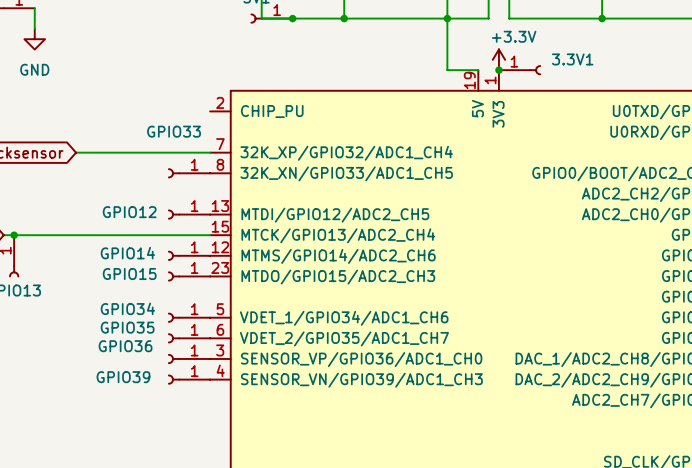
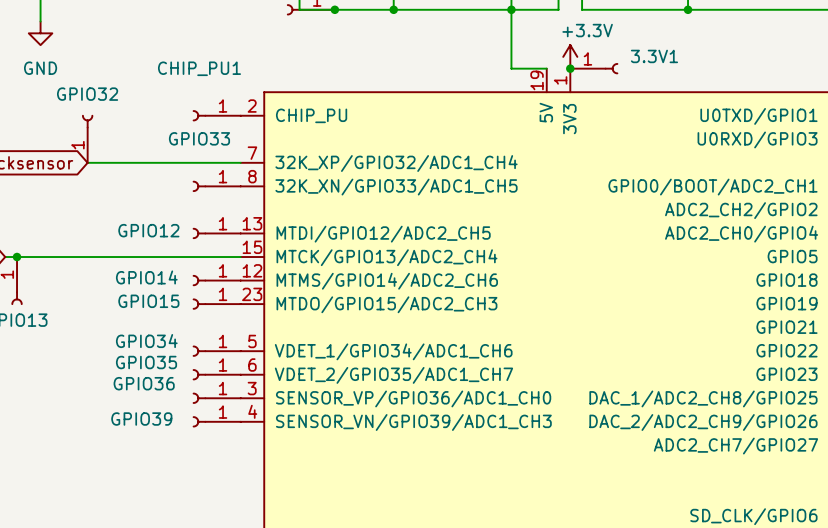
CHIP_PU1: none -> (216, 115)
GPIO32: none -> (87, 138)

